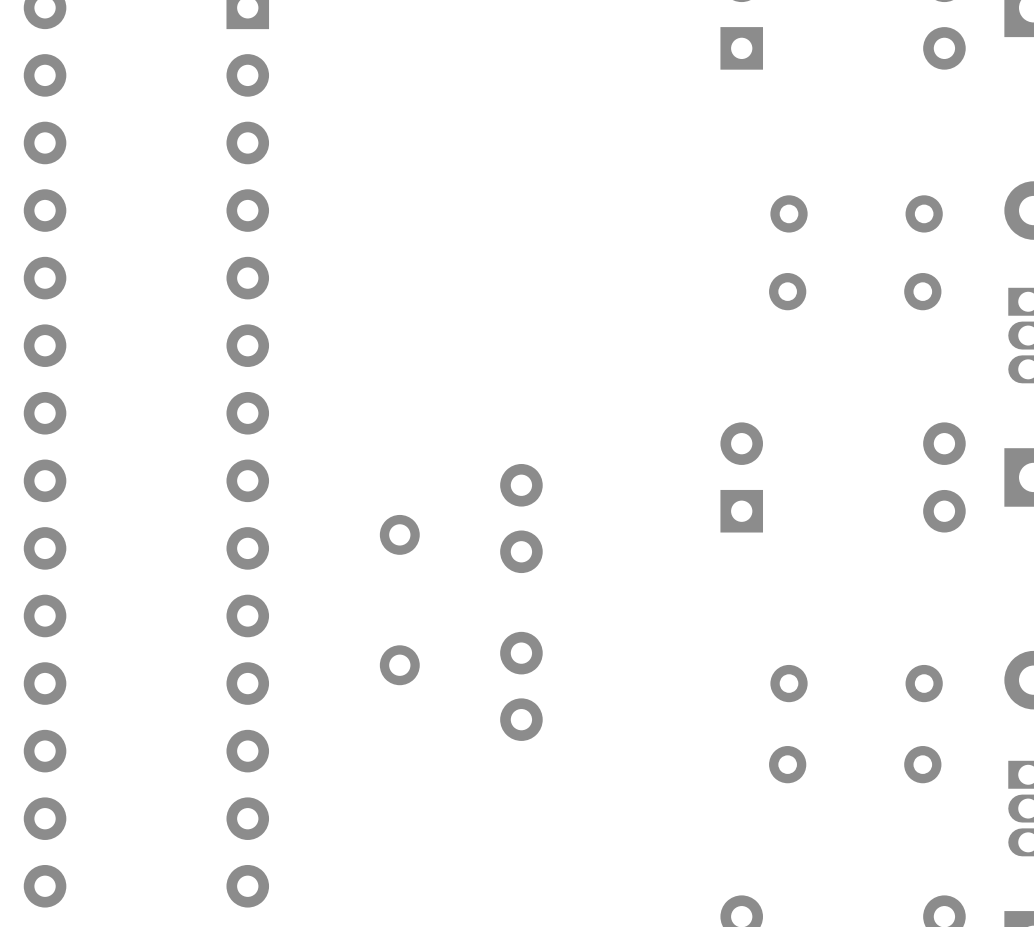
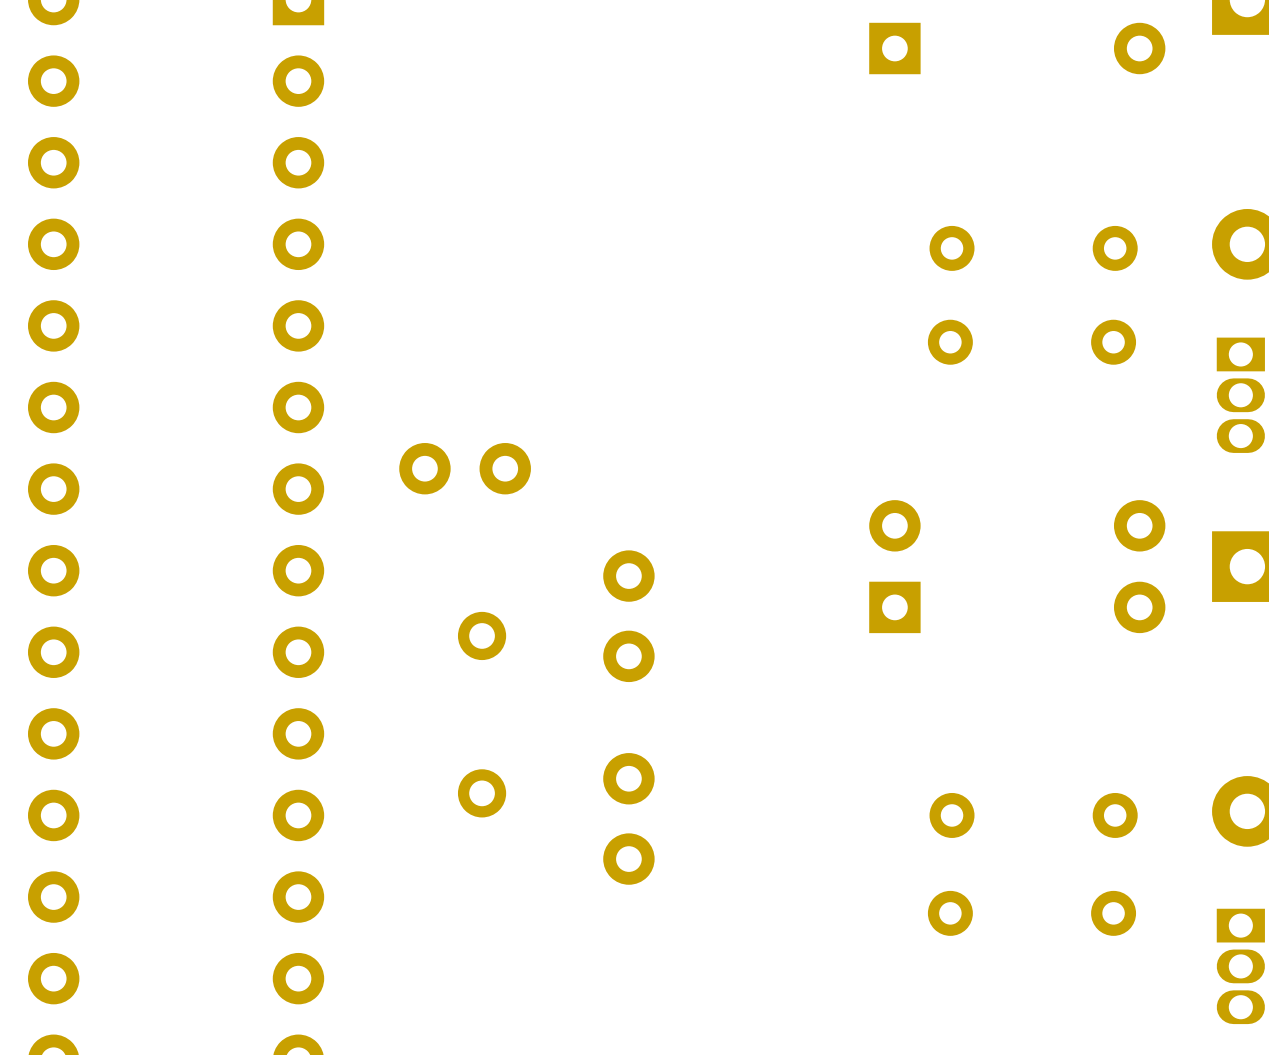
part: none -> (465, 468)

